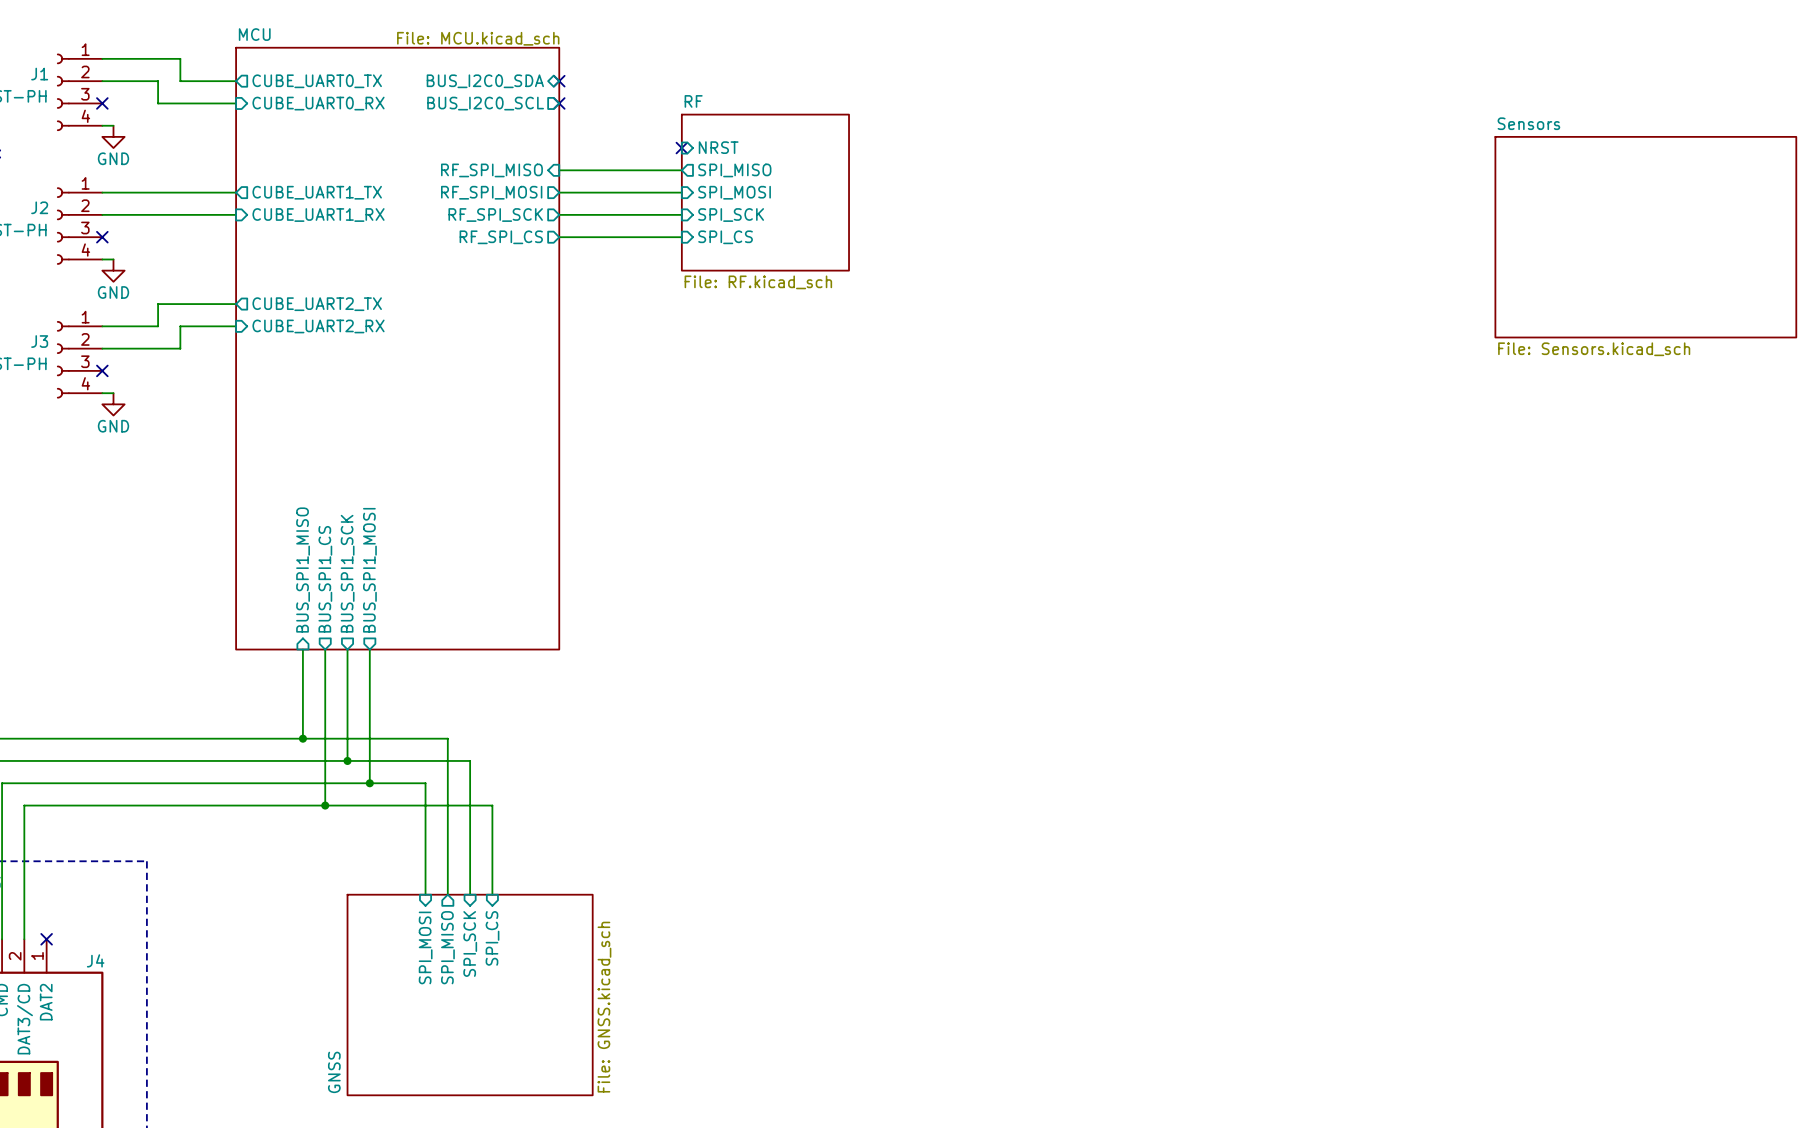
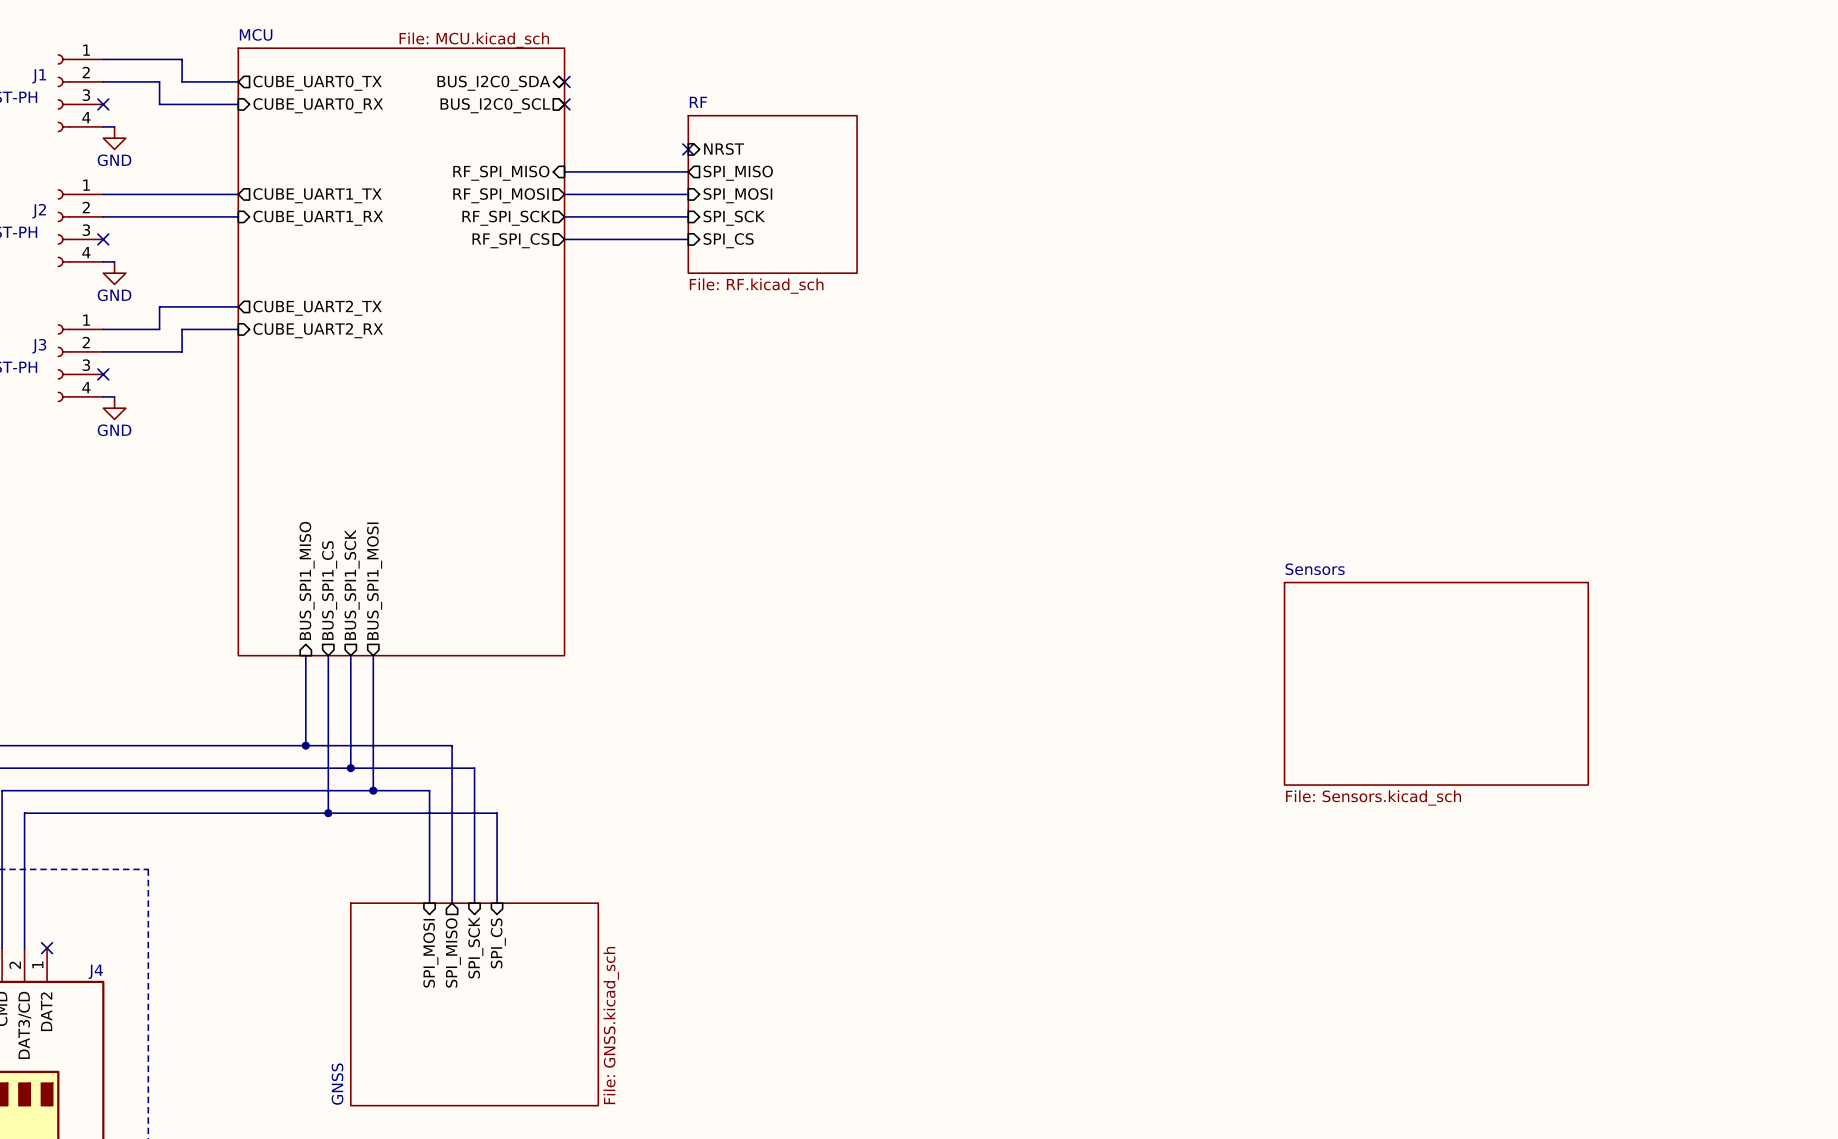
sheet Sensors: File: Sensors.kicad_sch (1645, 237) -> none
sheet Sensors: none -> File: Sensors.kicad_sch (1436, 683)

